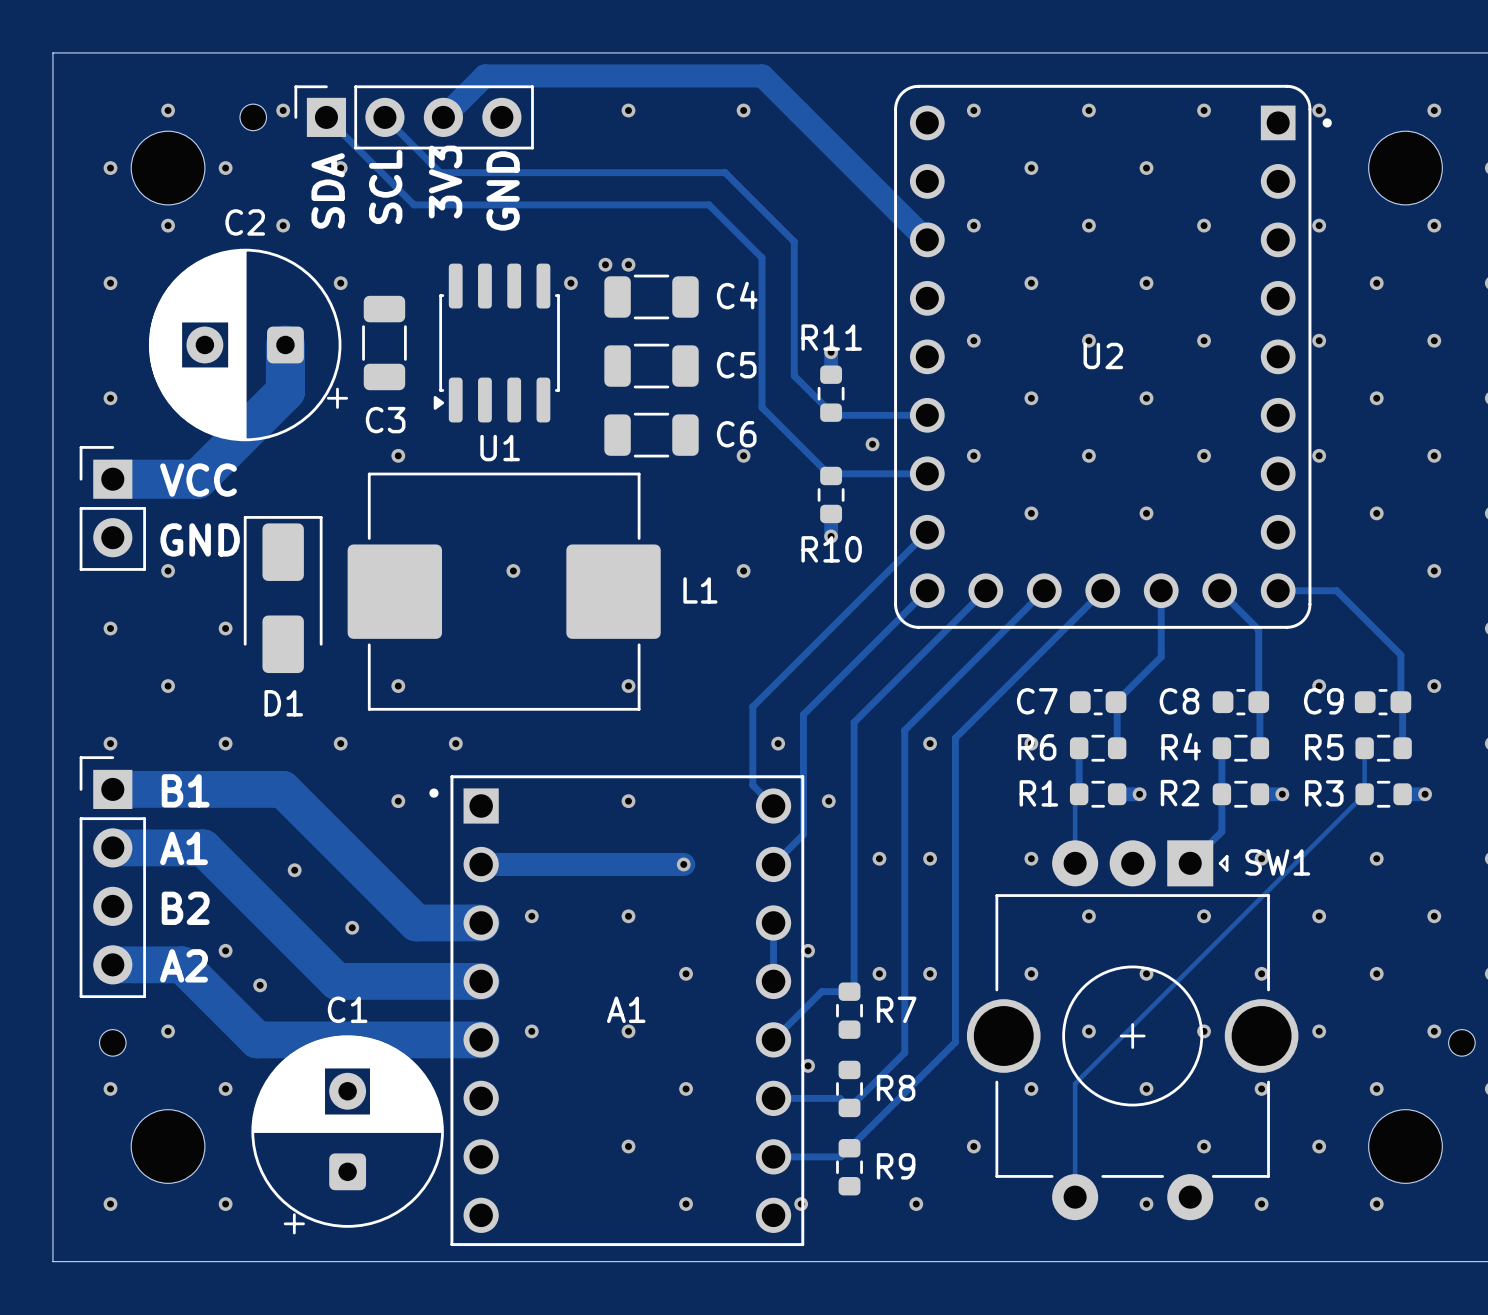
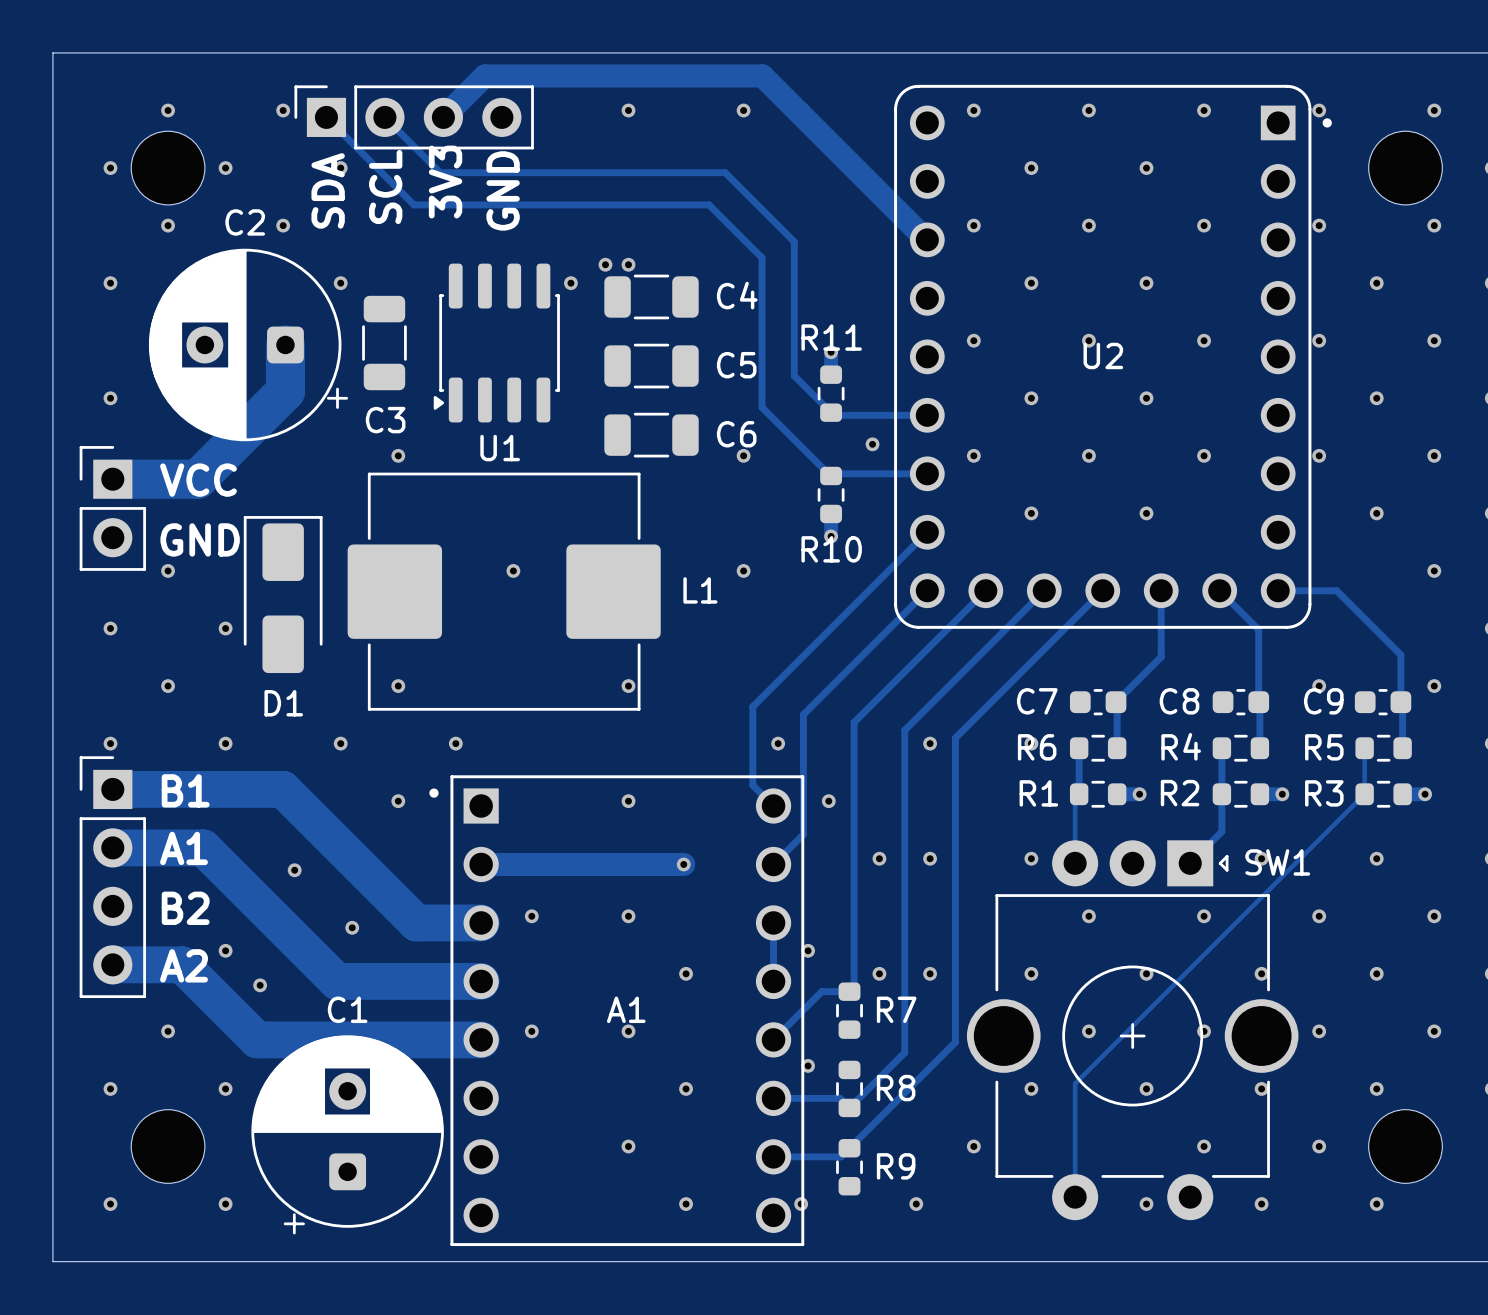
part: (253, 117) -> none
part: (112, 1042) -> none
part: (1461, 1042) -> none

